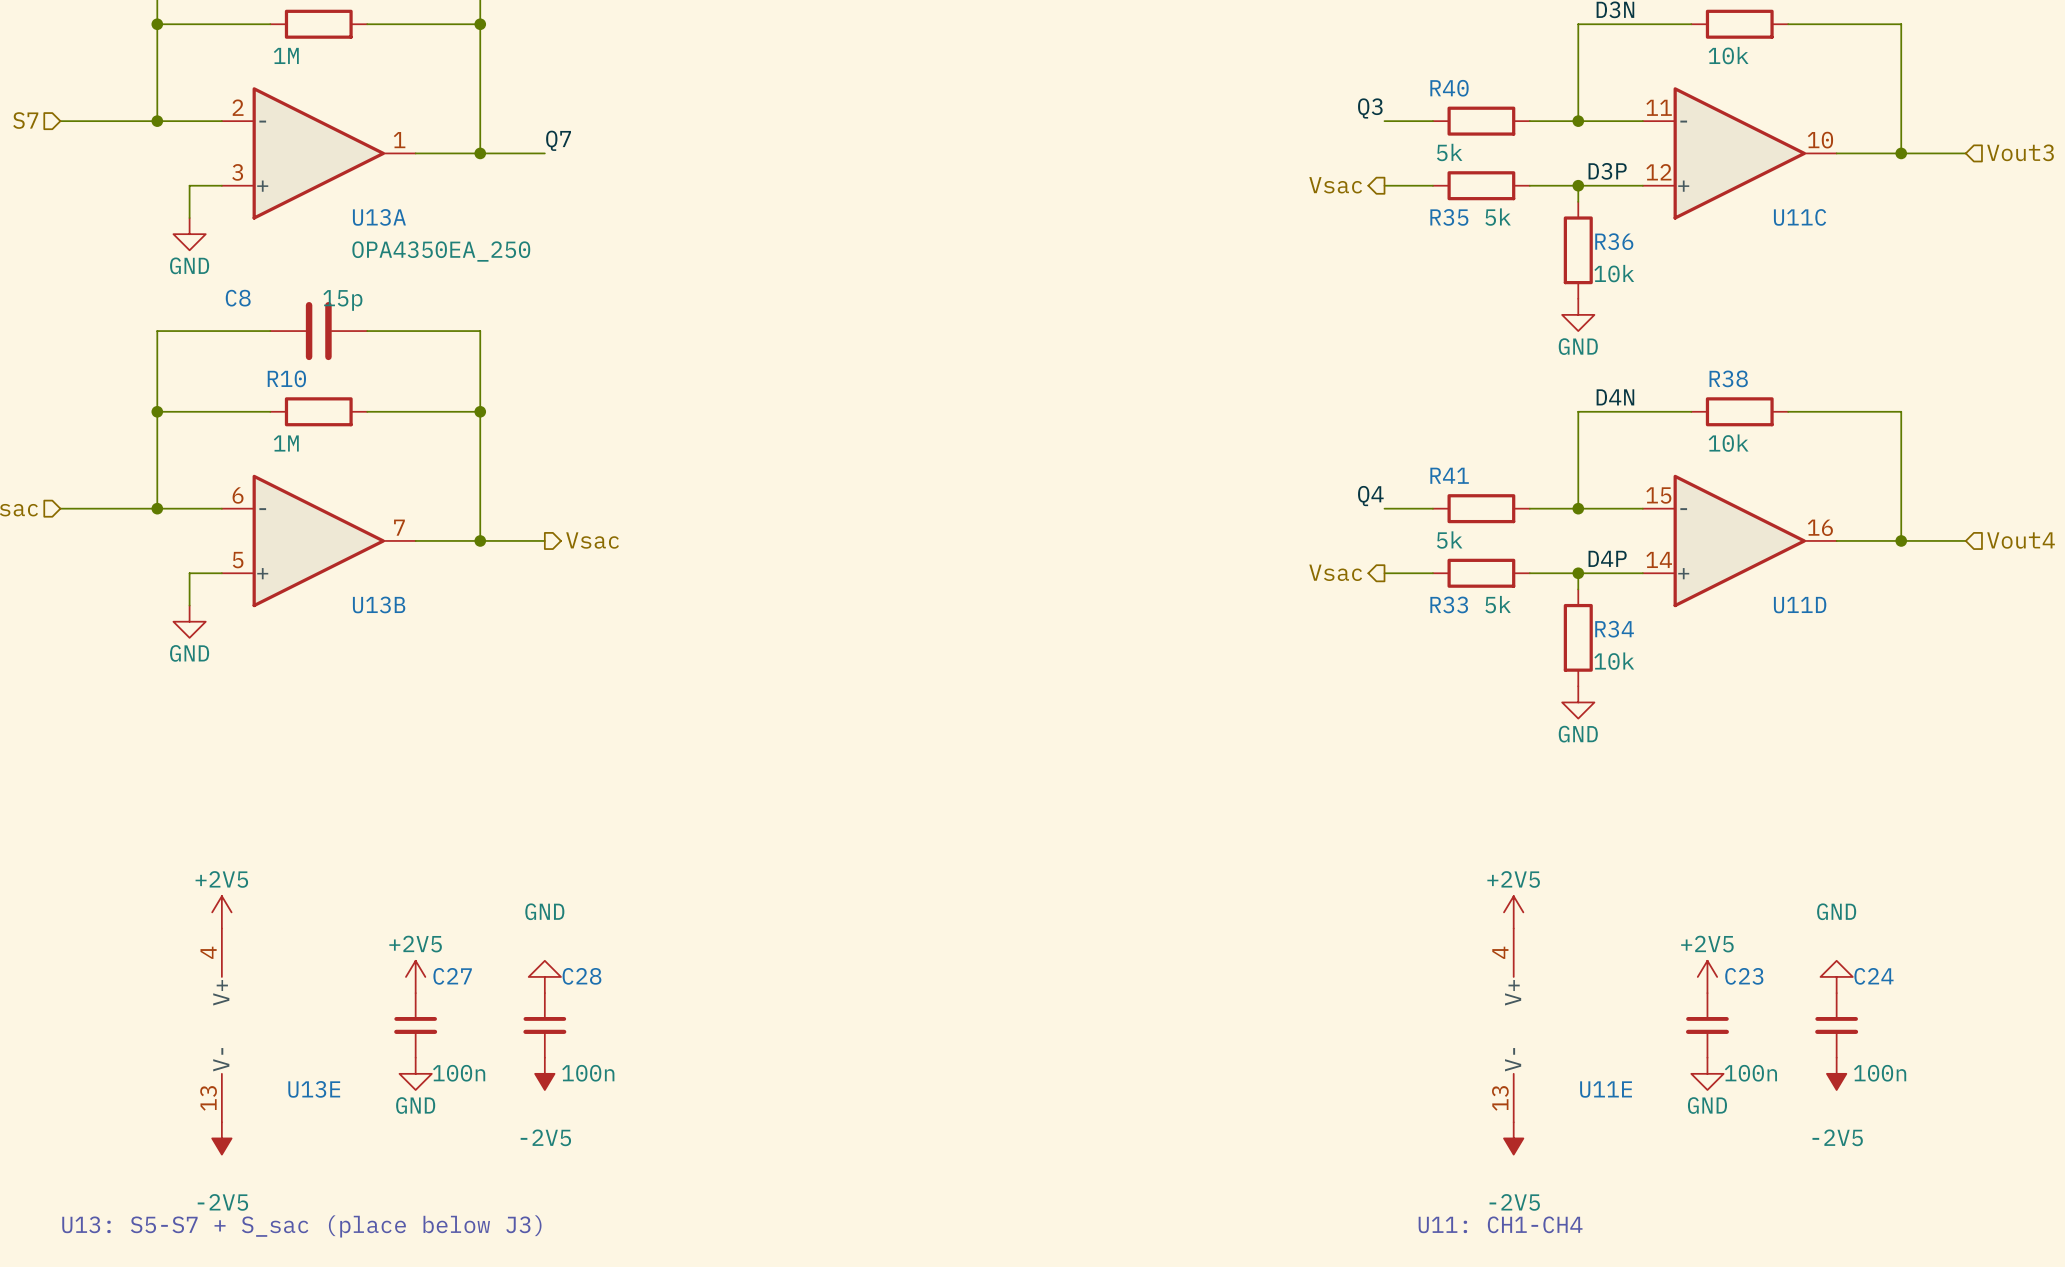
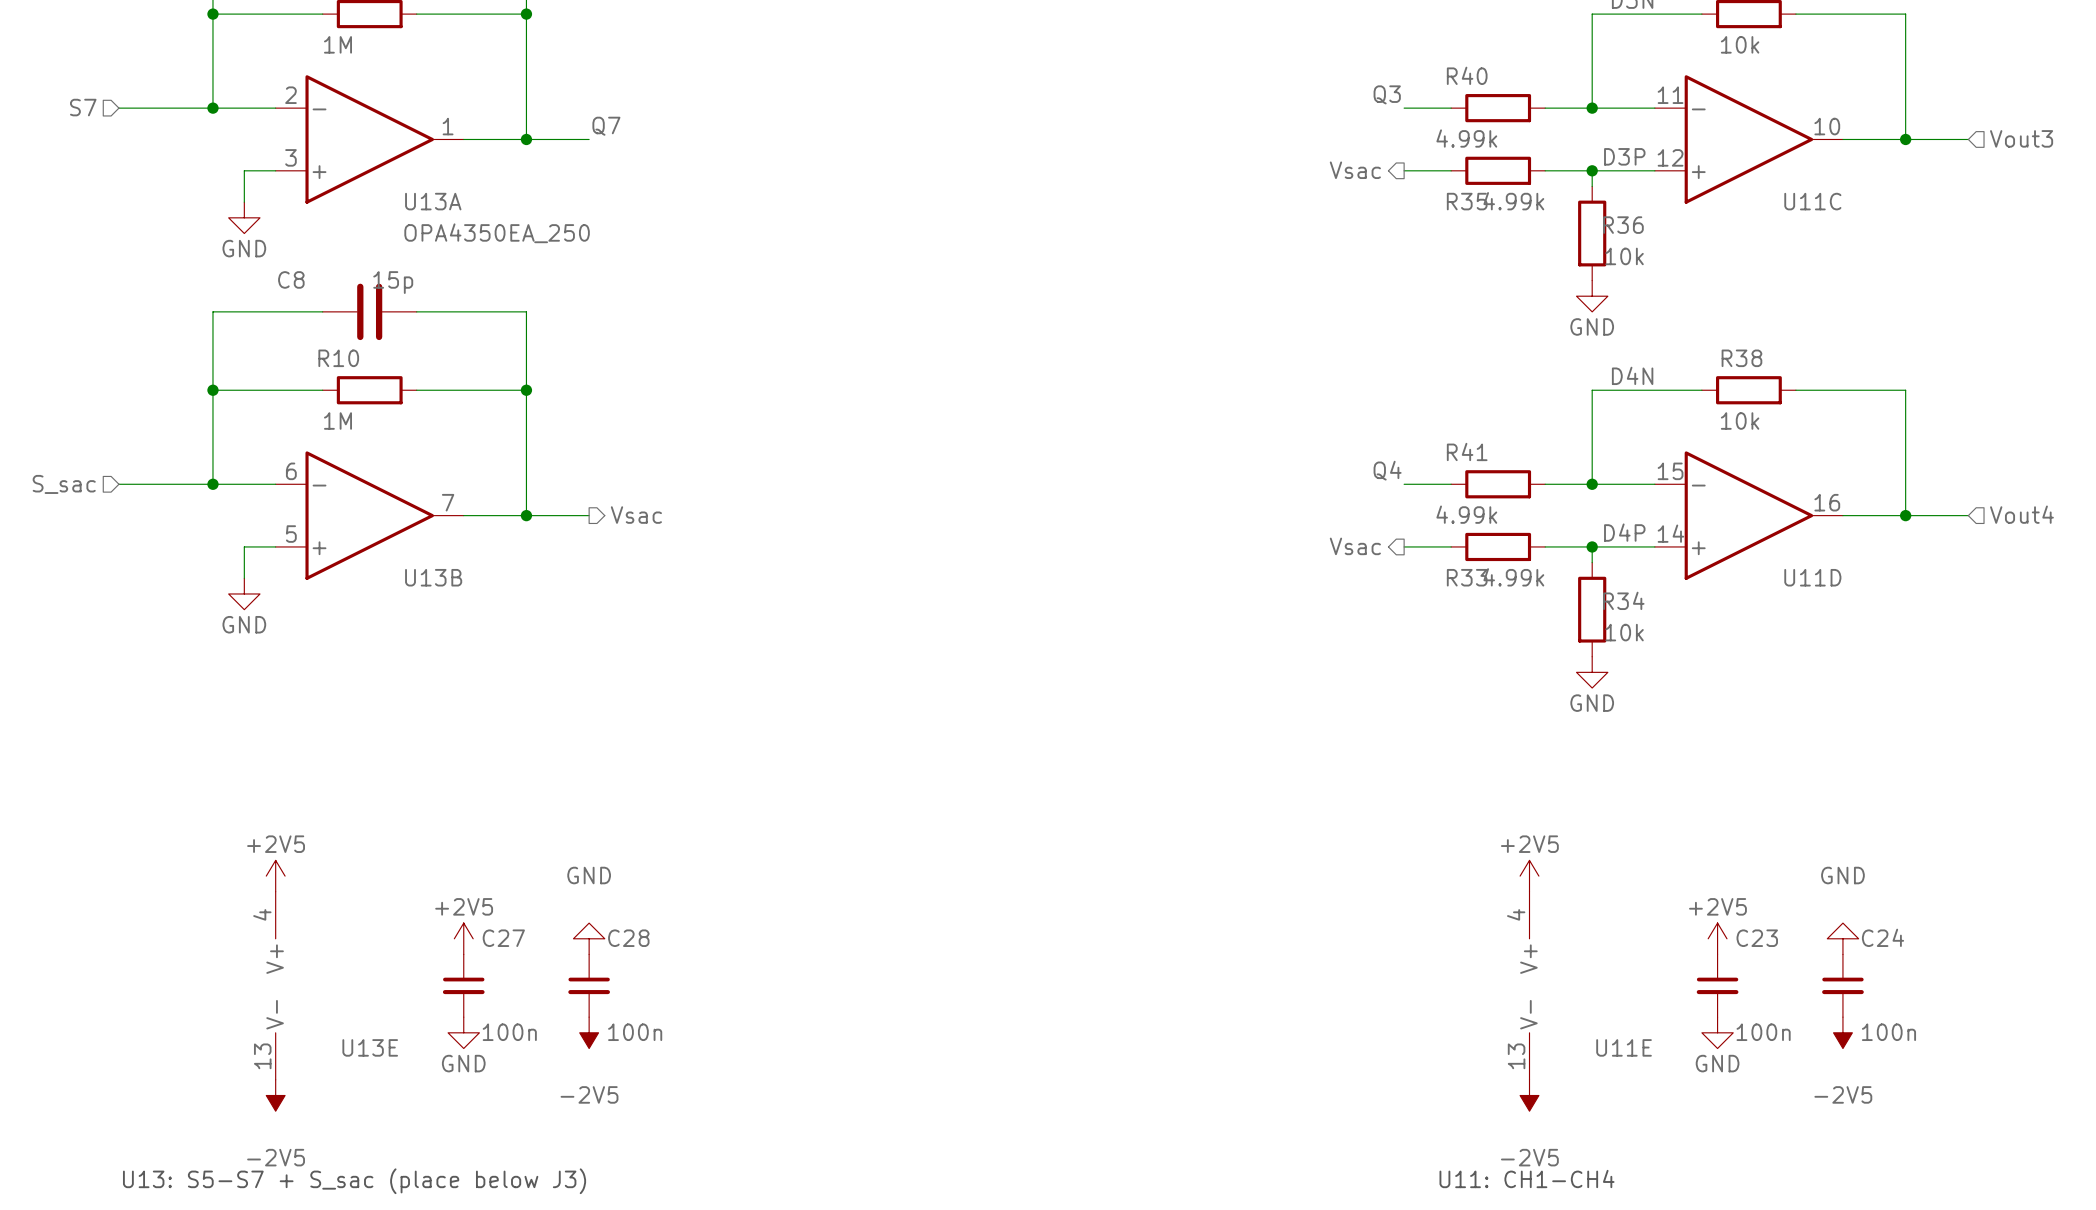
R40 value: 5k (1449, 152) -> 4.99k (1466, 138)
R35 value: 5k (1498, 217) -> 4.99k (1513, 201)
R41 value: 5k (1449, 540) -> 4.99k (1466, 514)
R33 value: 5k (1498, 604) -> 4.99k (1513, 577)

